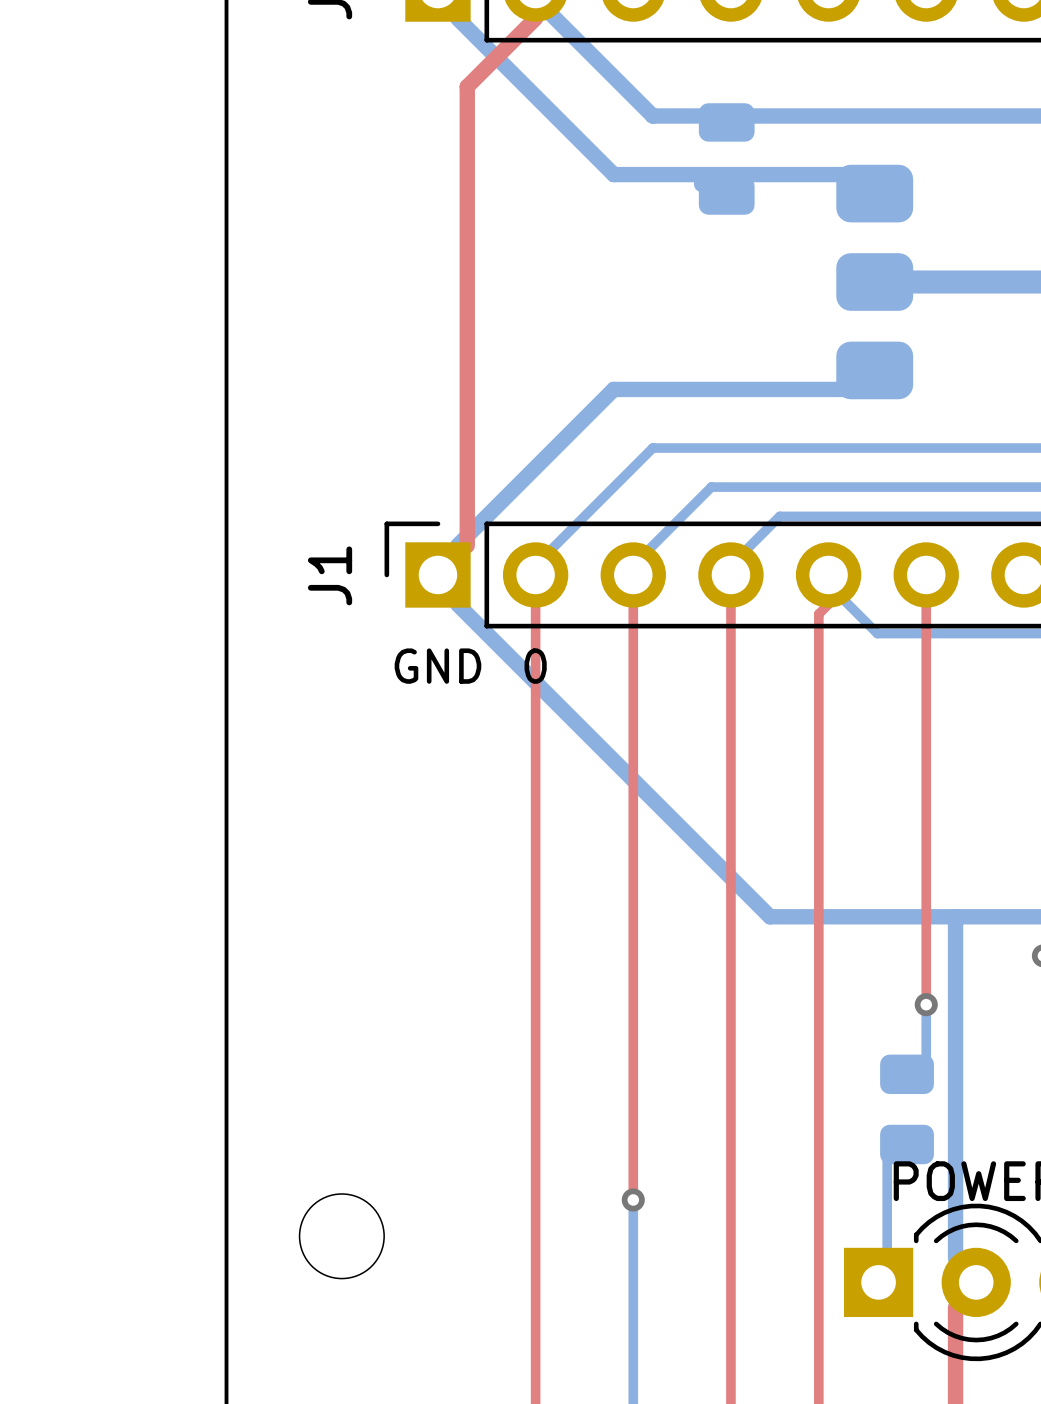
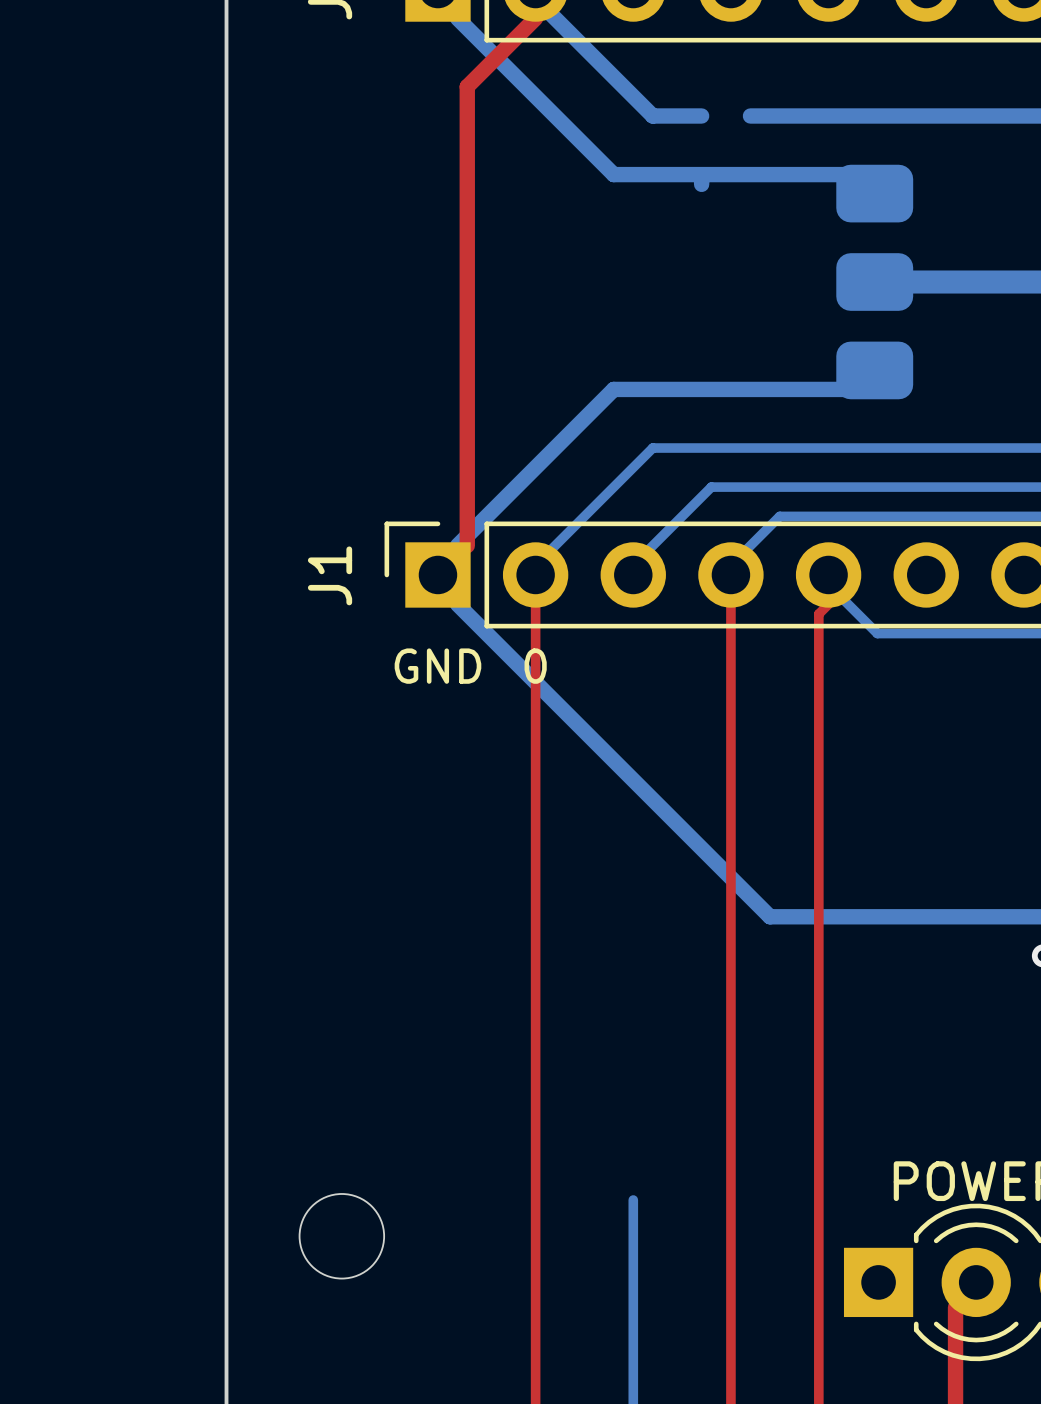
part: (726, 158) -> none
top track: (633, 604) (633, 1199) -> none
top track: (926, 604) (926, 1004) -> none
bottom track: (955, 916) (955, 1258) -> none
bottom track: (926, 1004) (926, 1063) -> none
via: (926, 1004) -> none
part: (907, 1109) -> none
bottom track: (887, 1160) (887, 1258) -> none
via: (633, 1199) -> none

